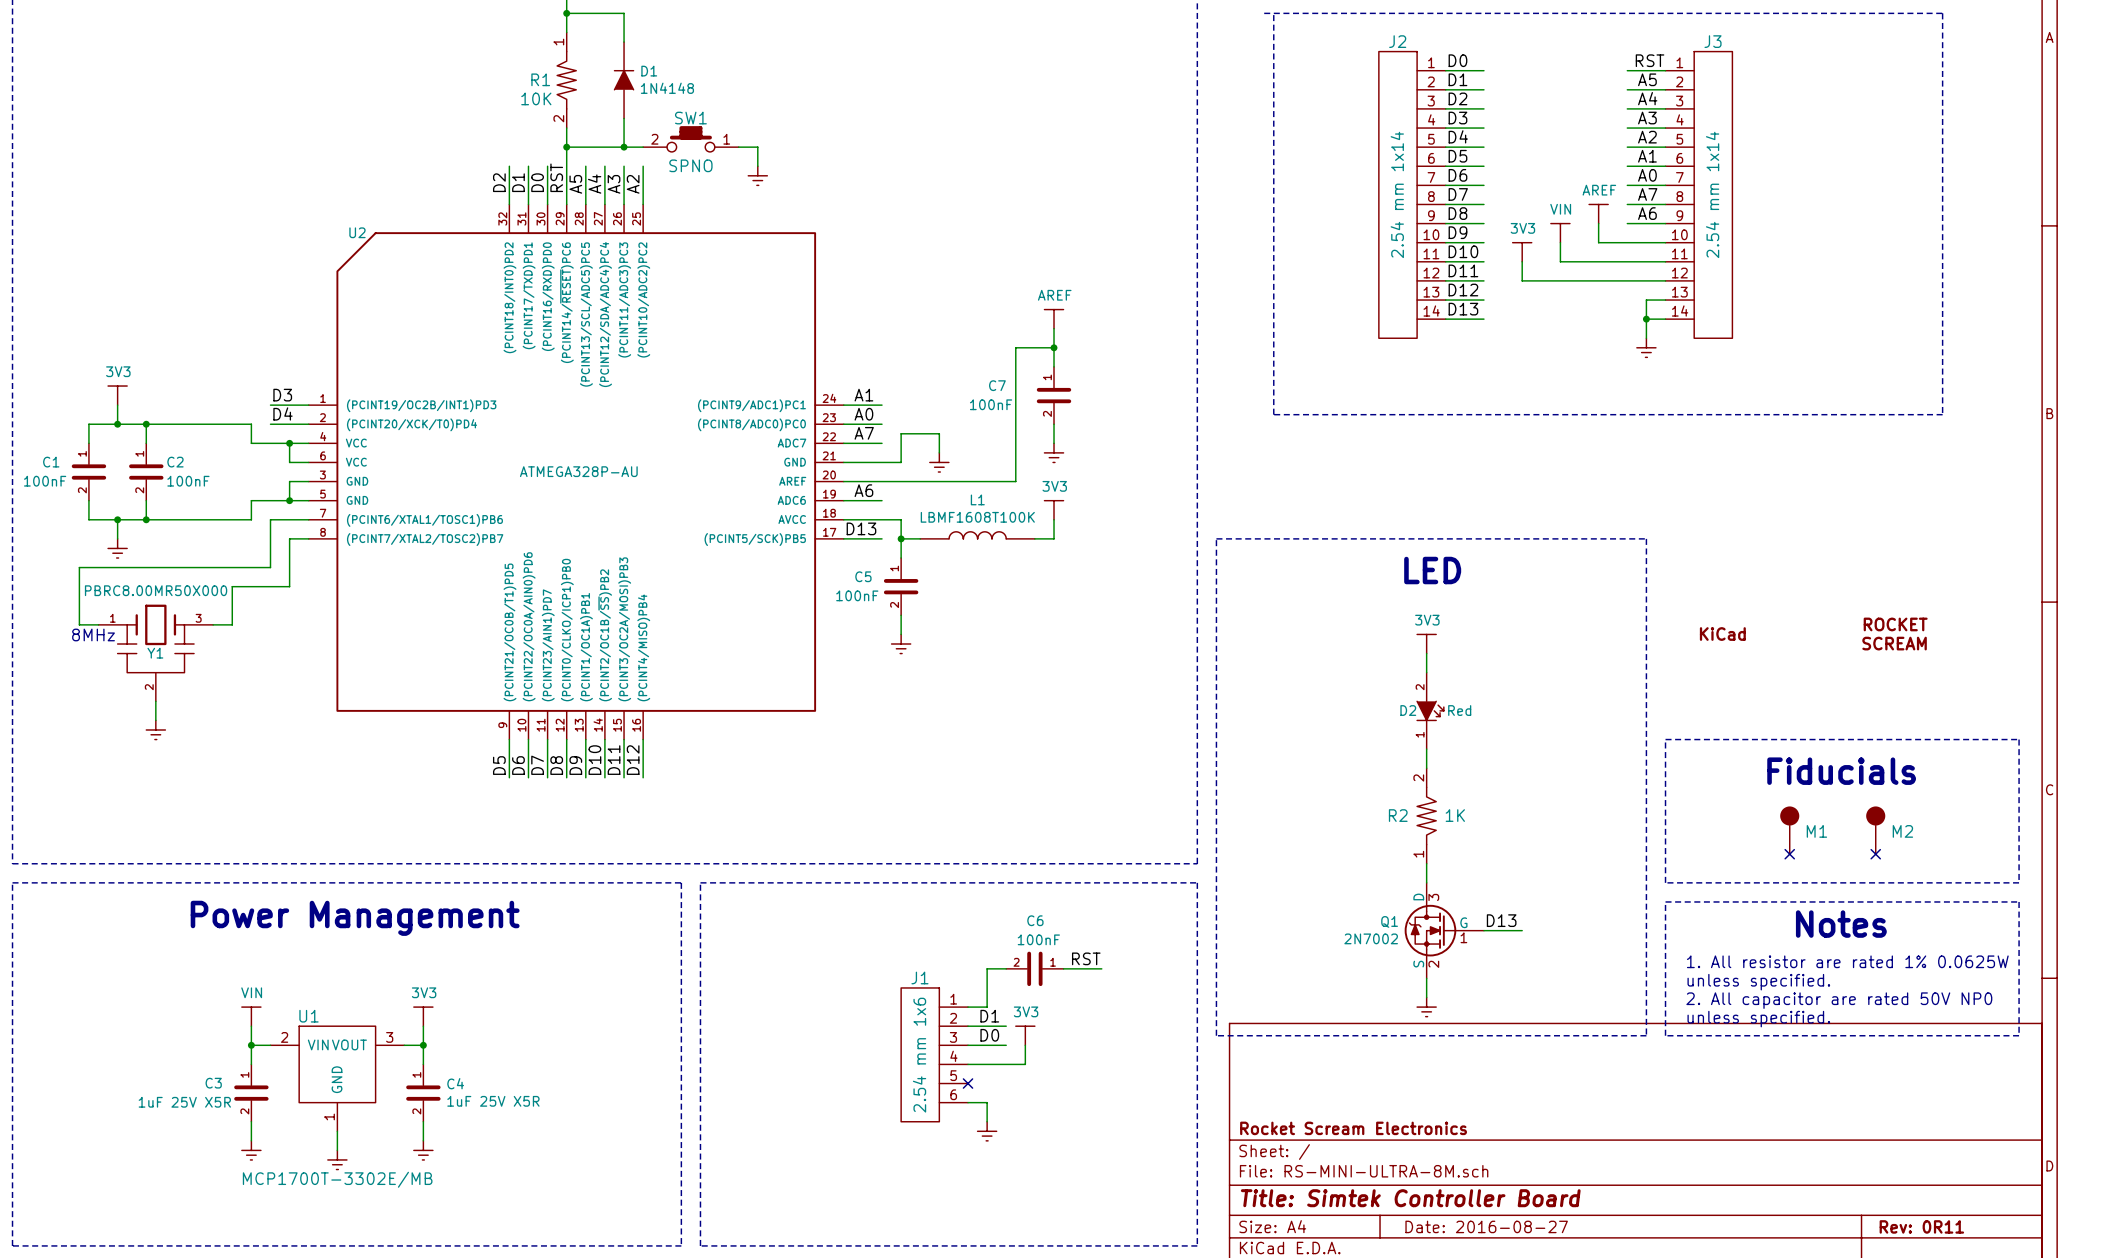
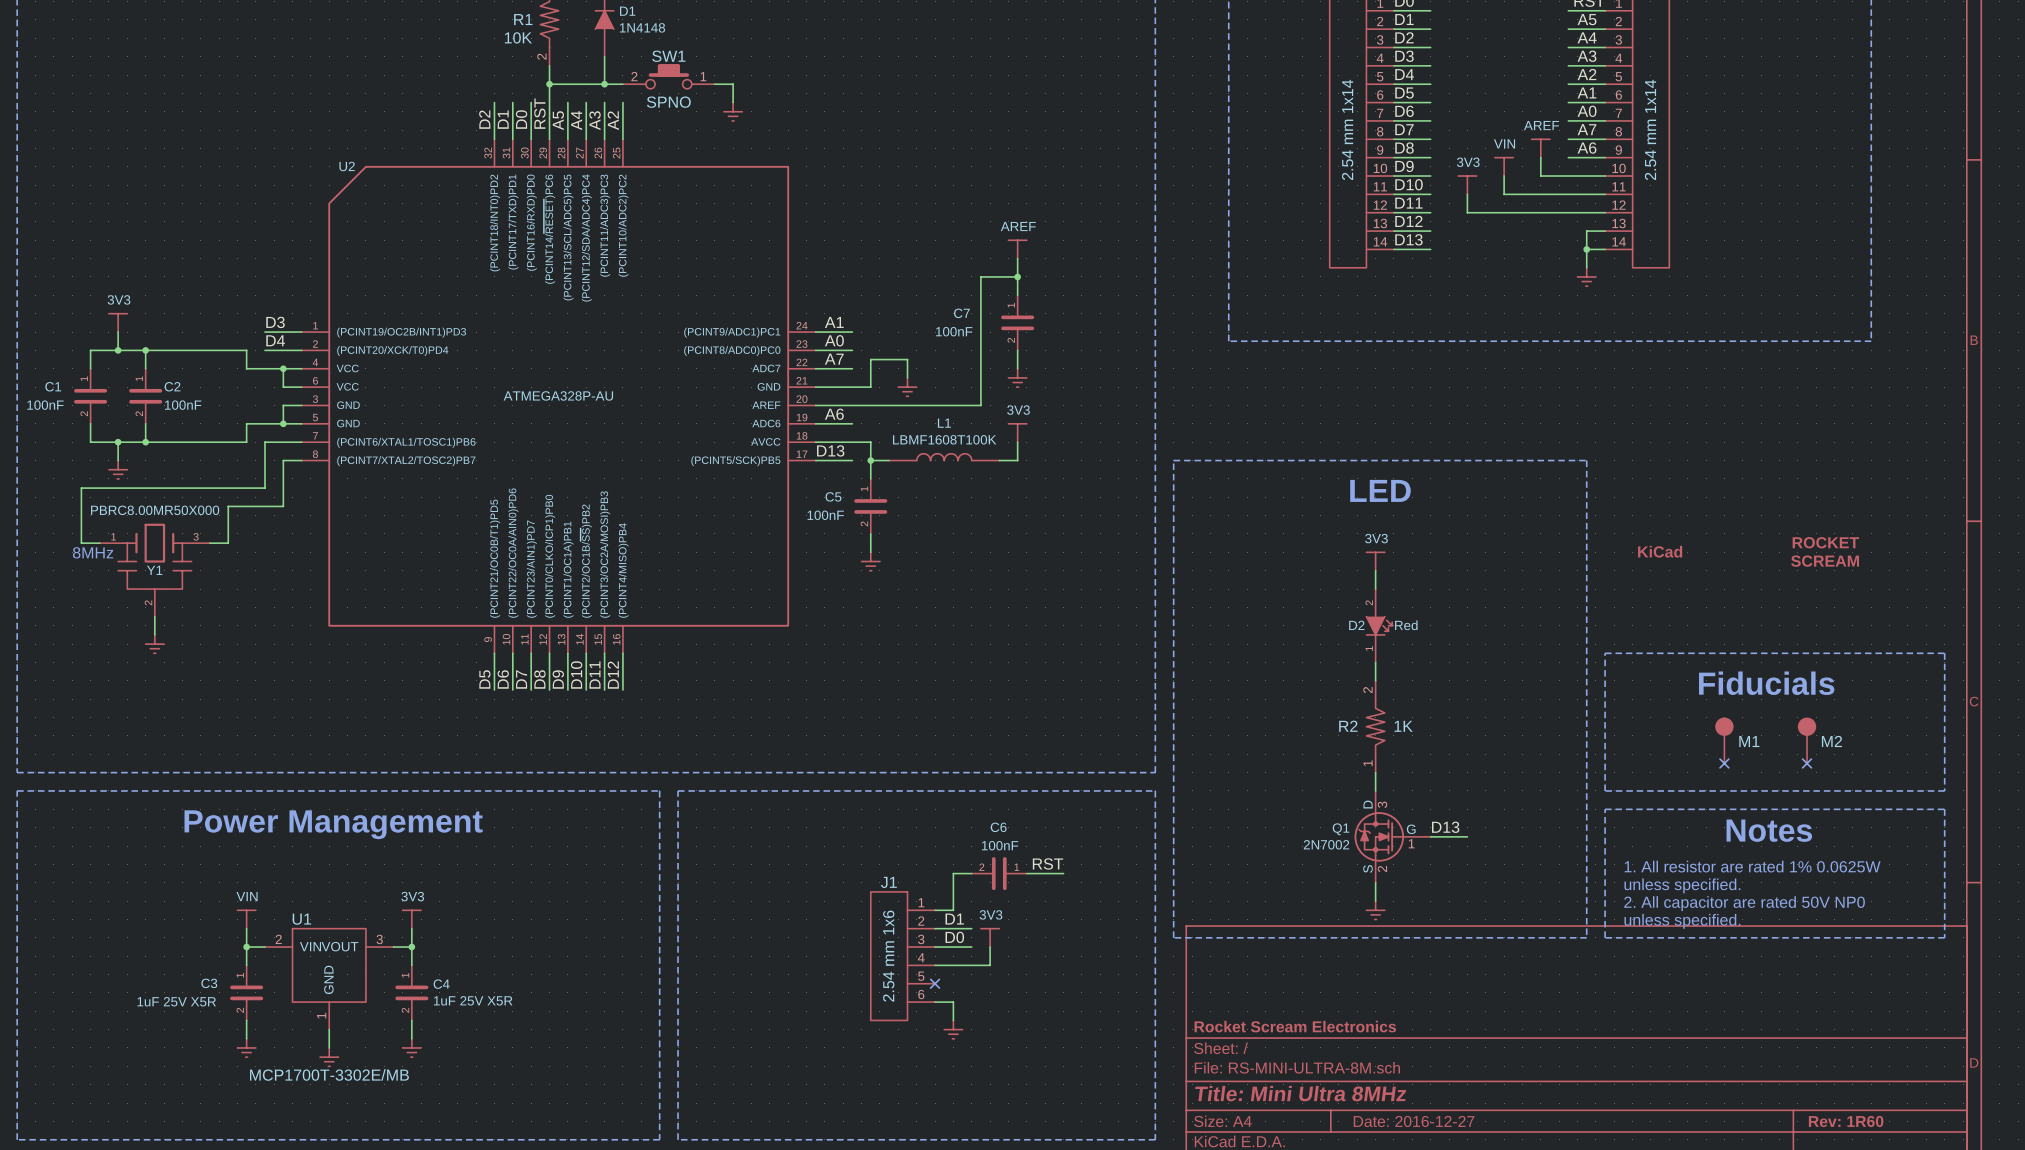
title block: Title: Simtek Controller Board (1410, 1198) -> Title: Mini Ultra 8MHz (1300, 1093)
title block: Date: 2016-08-27 (1486, 1226) -> Date: 2016-12-27 (1414, 1121)
title block: Rev: 0R11 (1921, 1226) -> Rev: 1R60 (1846, 1121)

